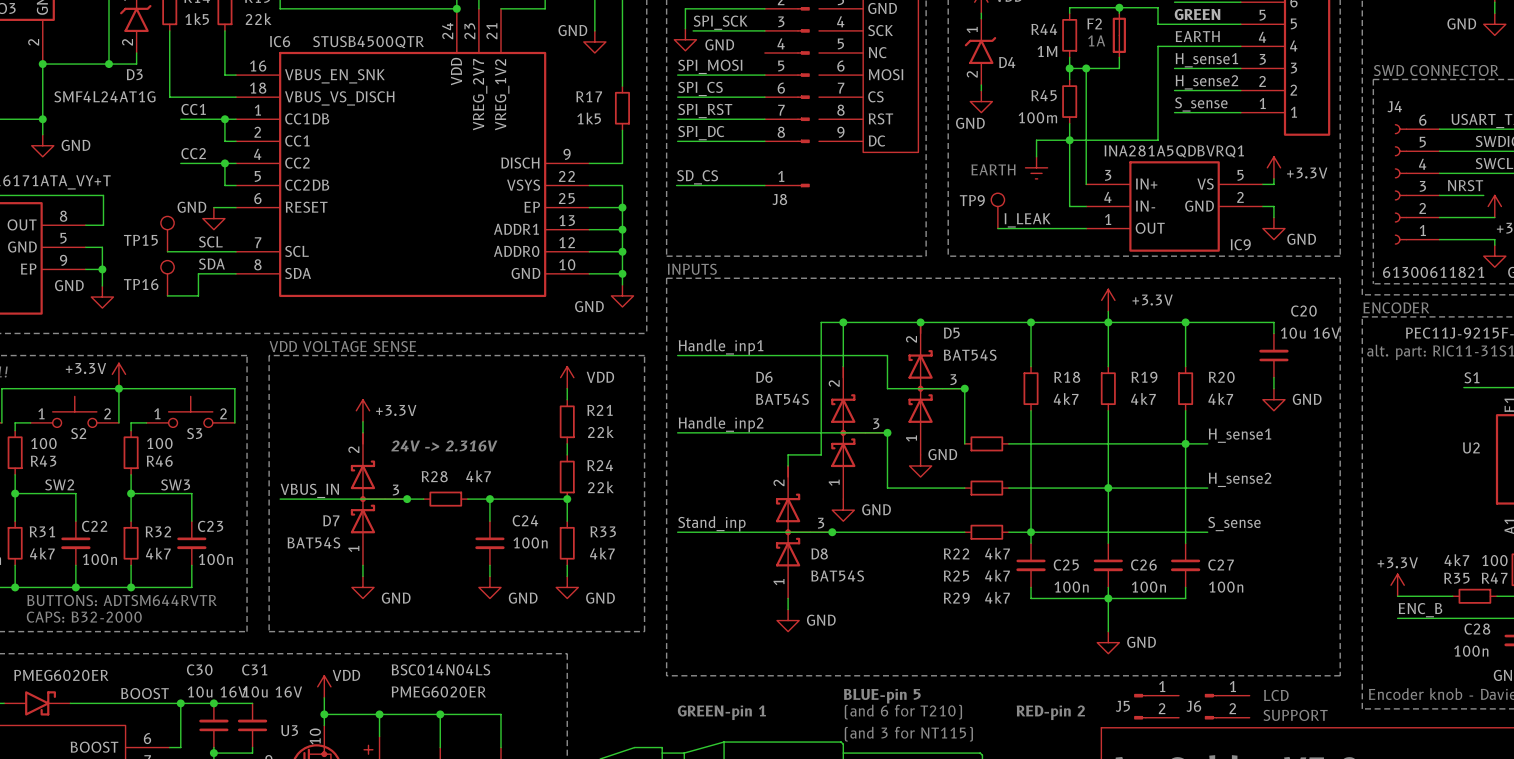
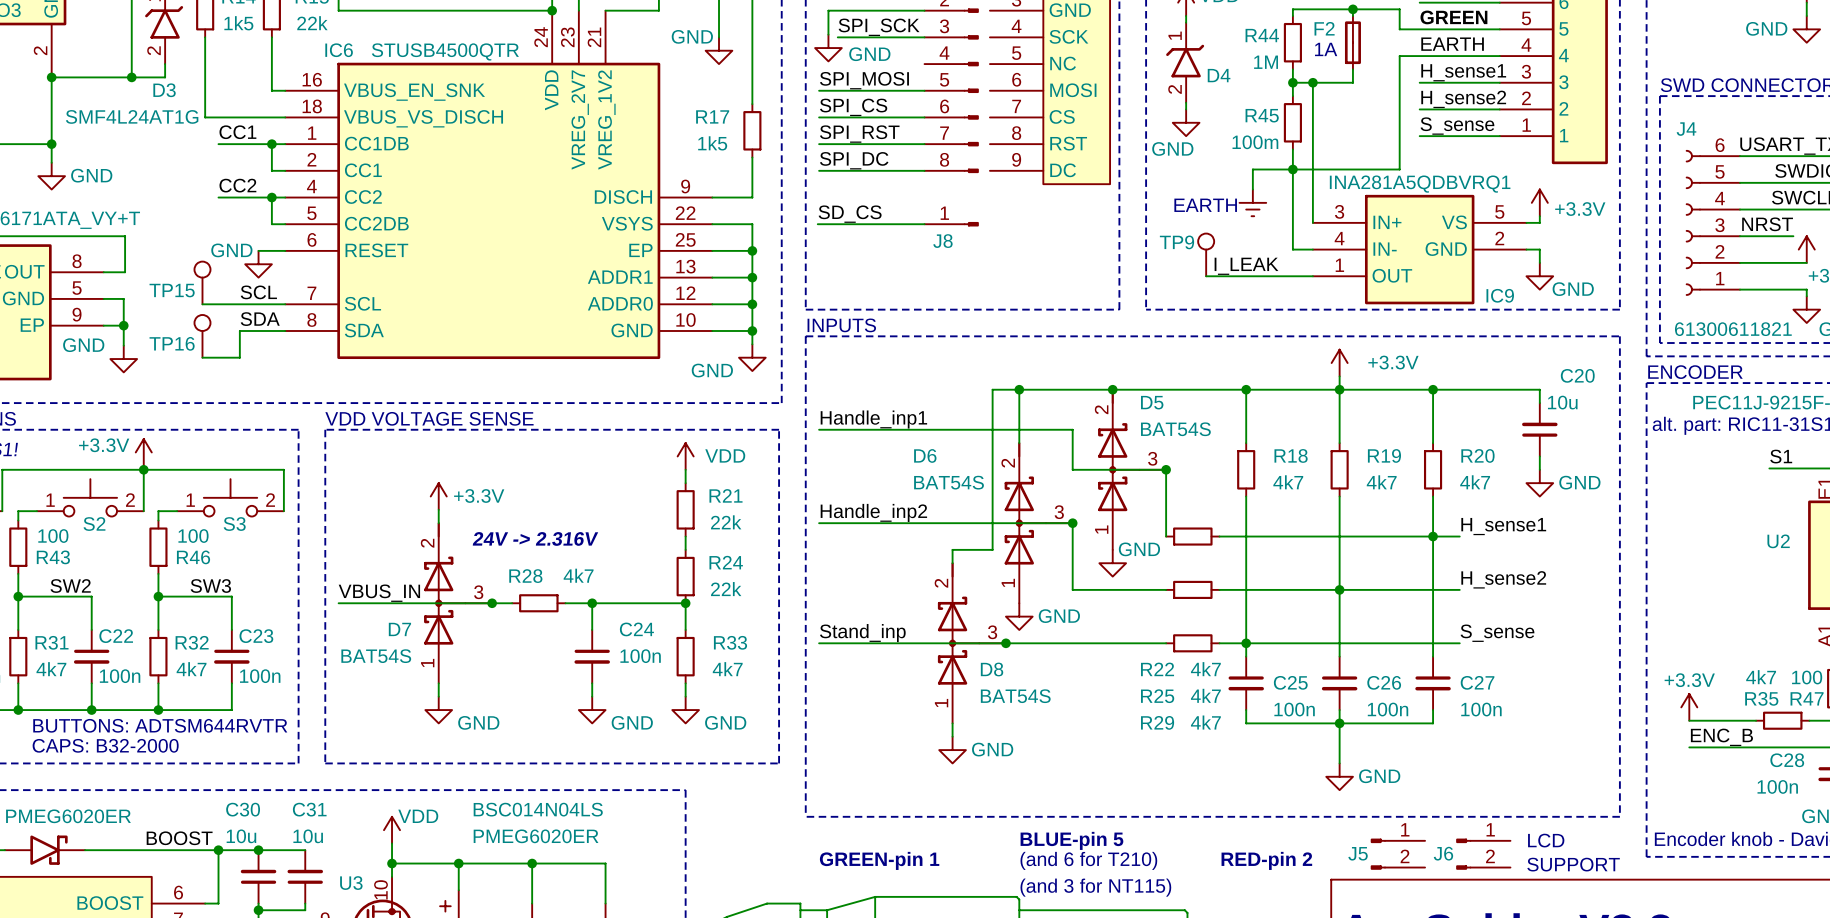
C20 value: 10u 16V (1310, 333) -> 10u (1562, 402)
C30 value: 10u 16V (217, 692) -> 10u (241, 836)
C31 value: 10u 16V (272, 692) -> 10u (308, 836)

